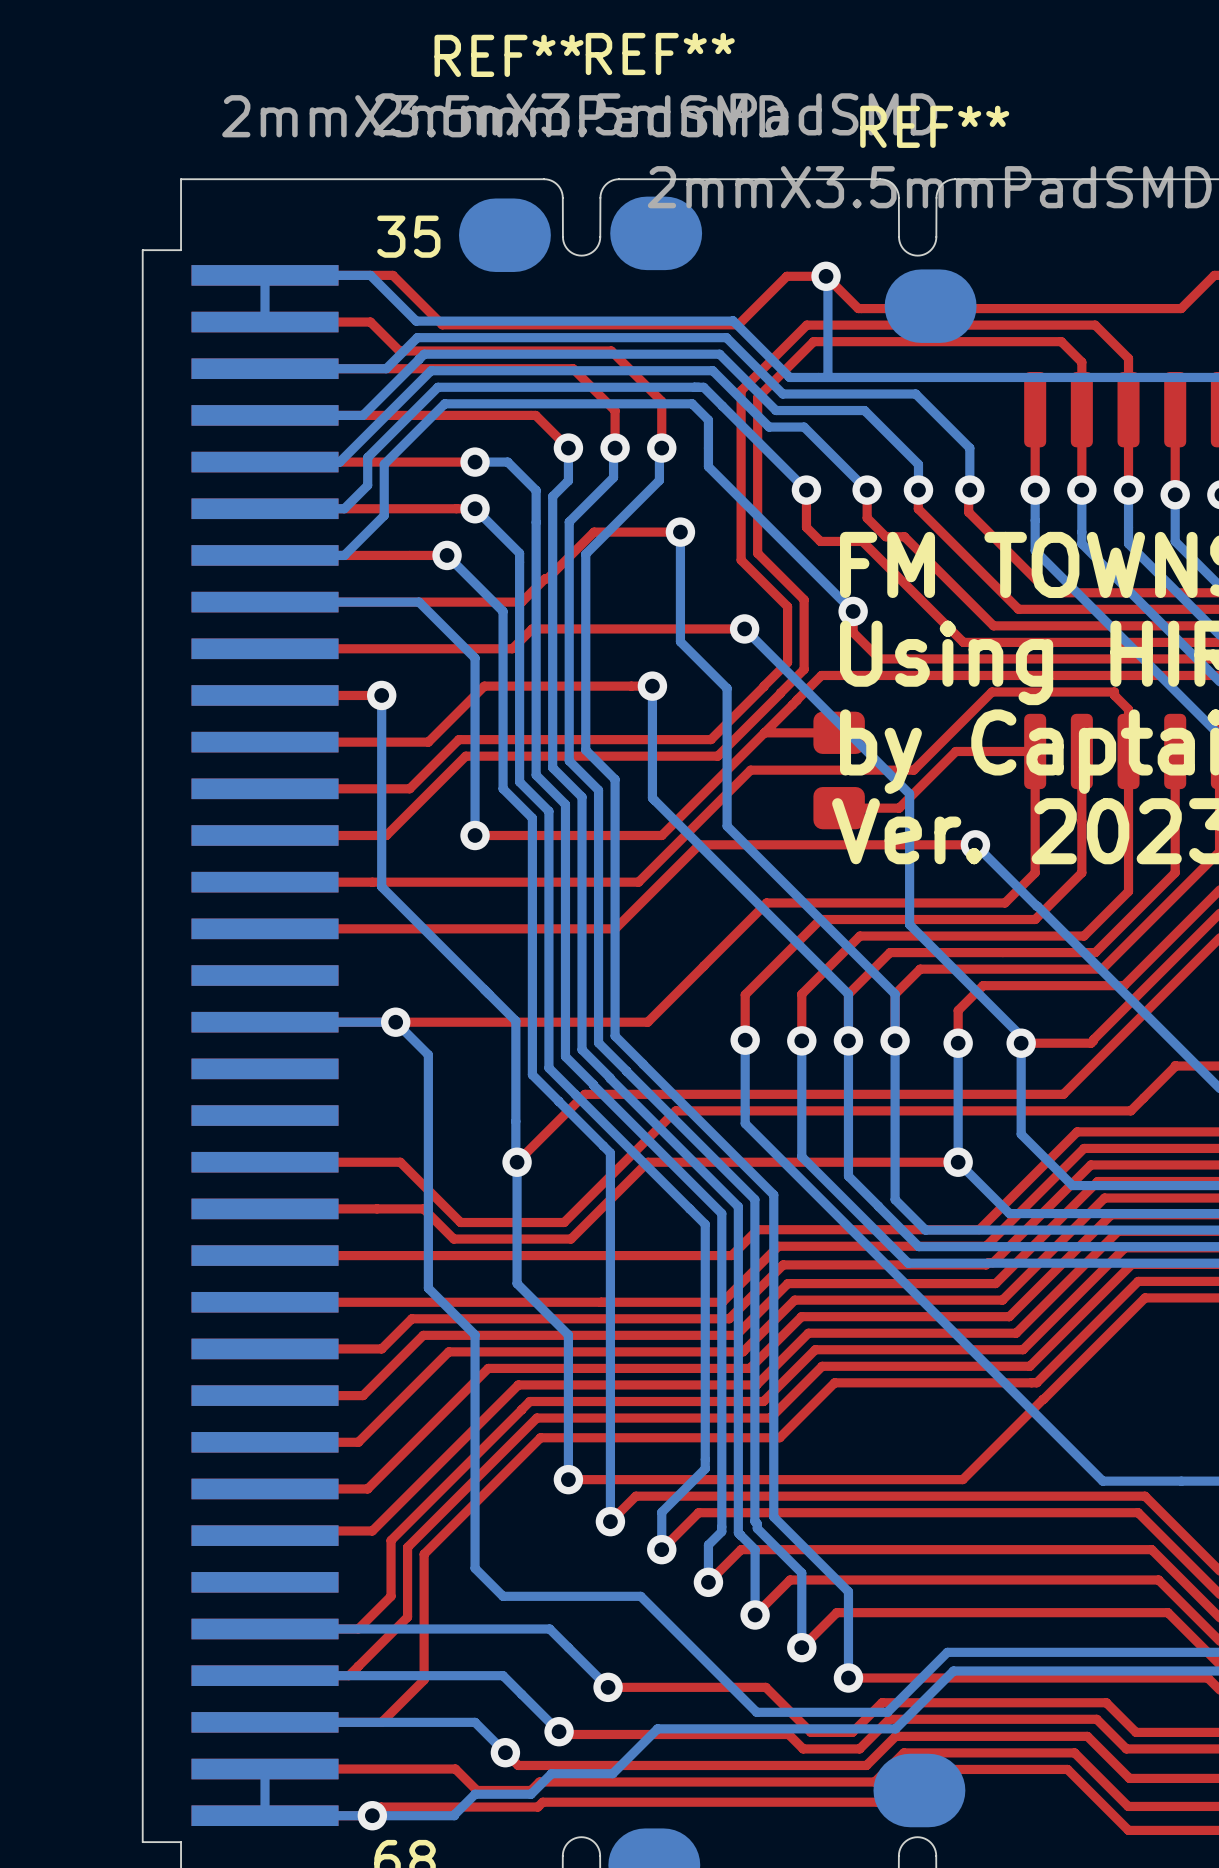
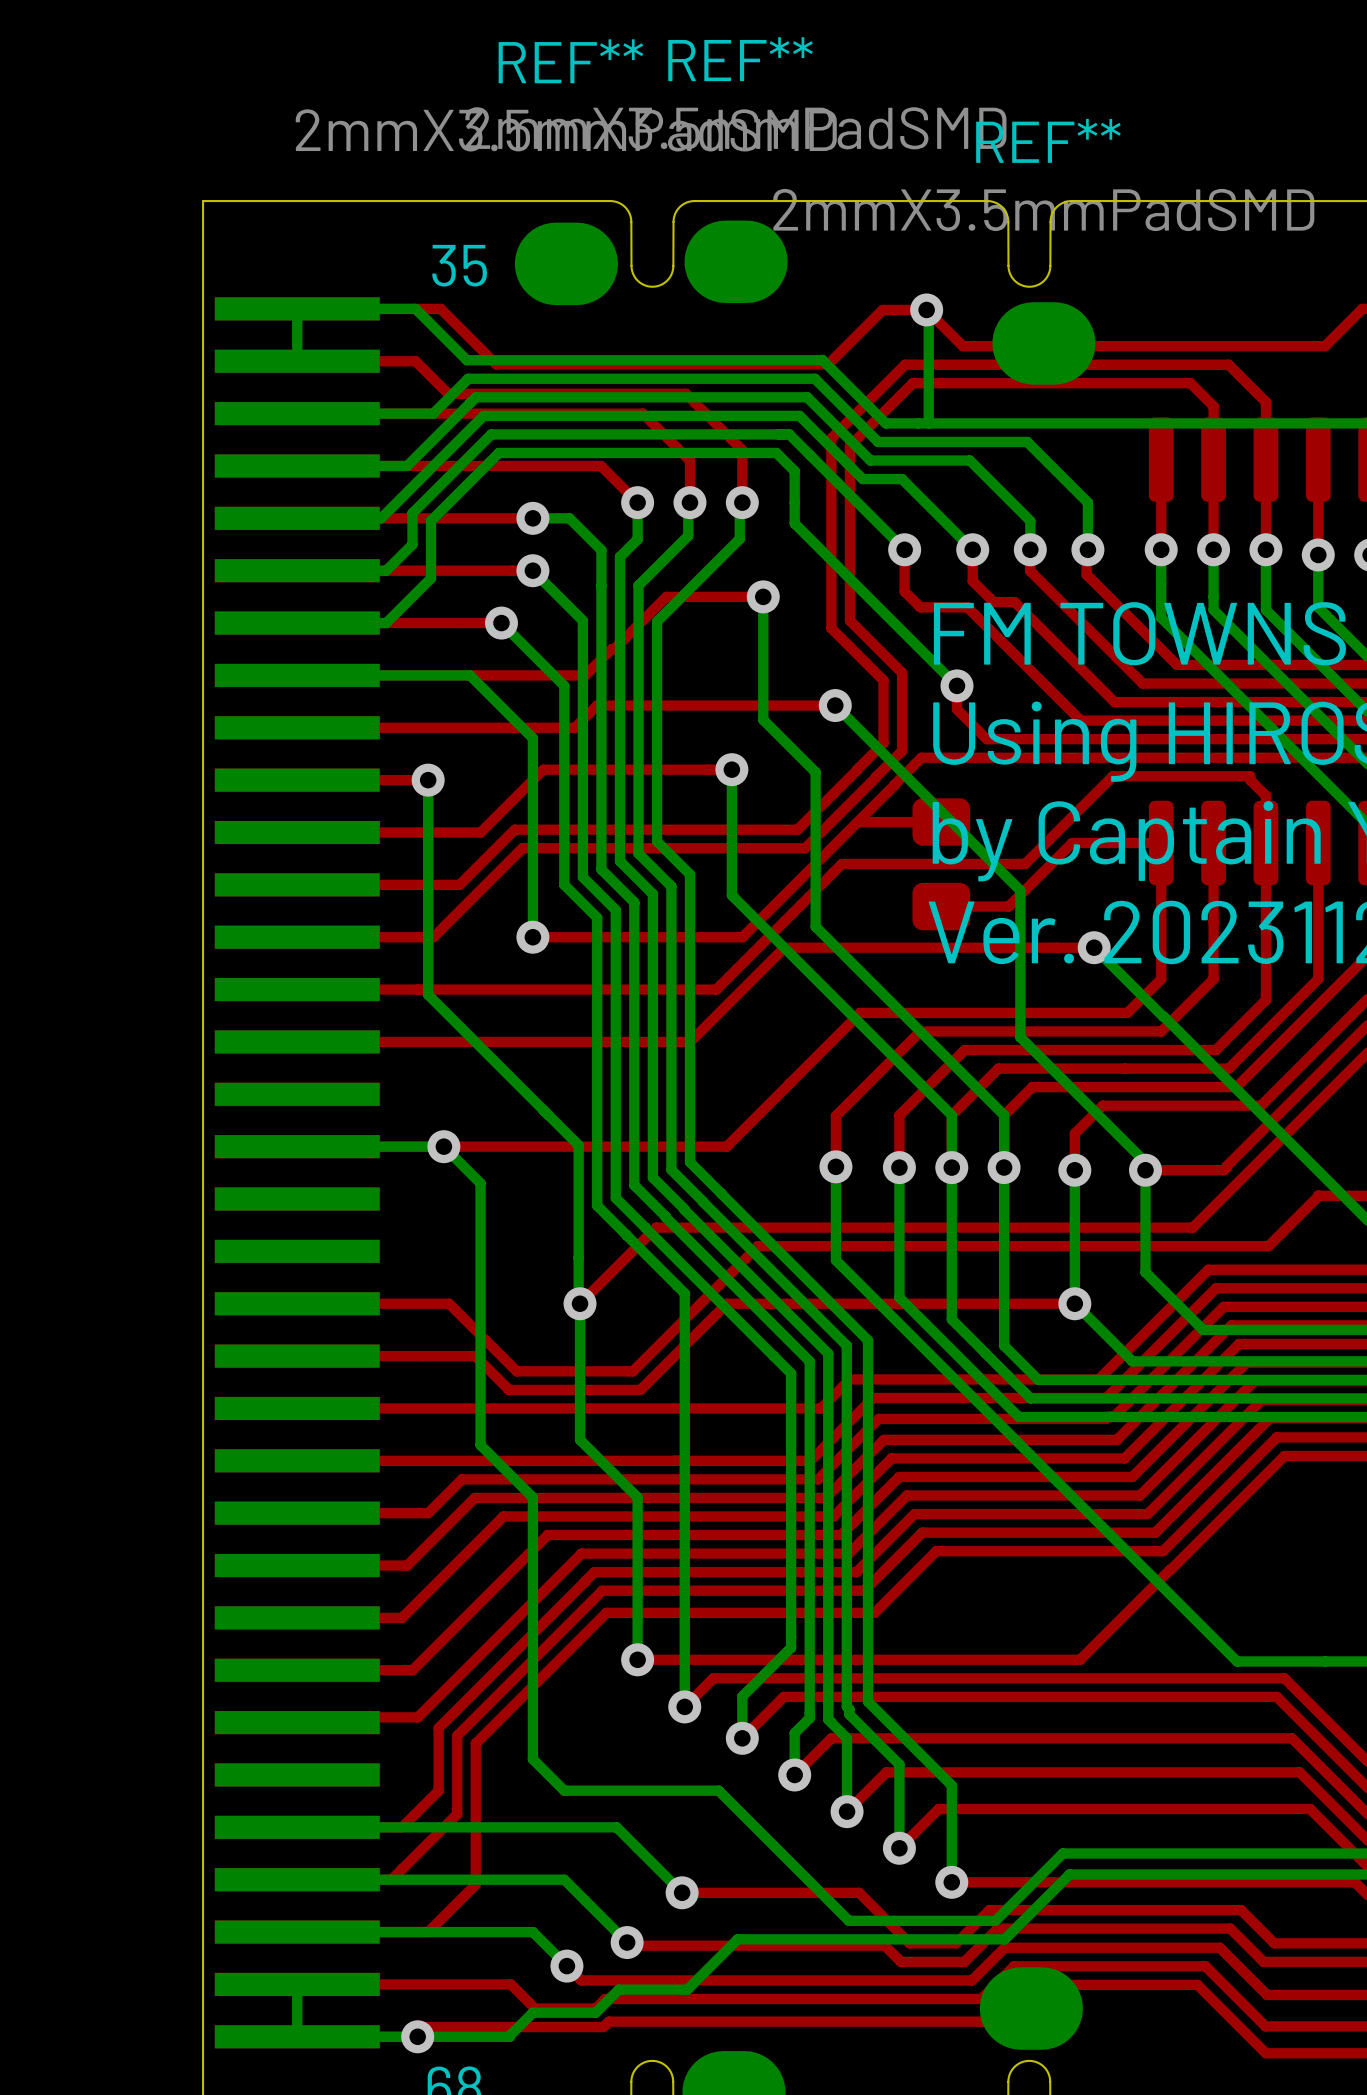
board edge: (181, 250) (142, 250) (142, 1842) (181, 1842) -> (203, 280) (203, 2066)

